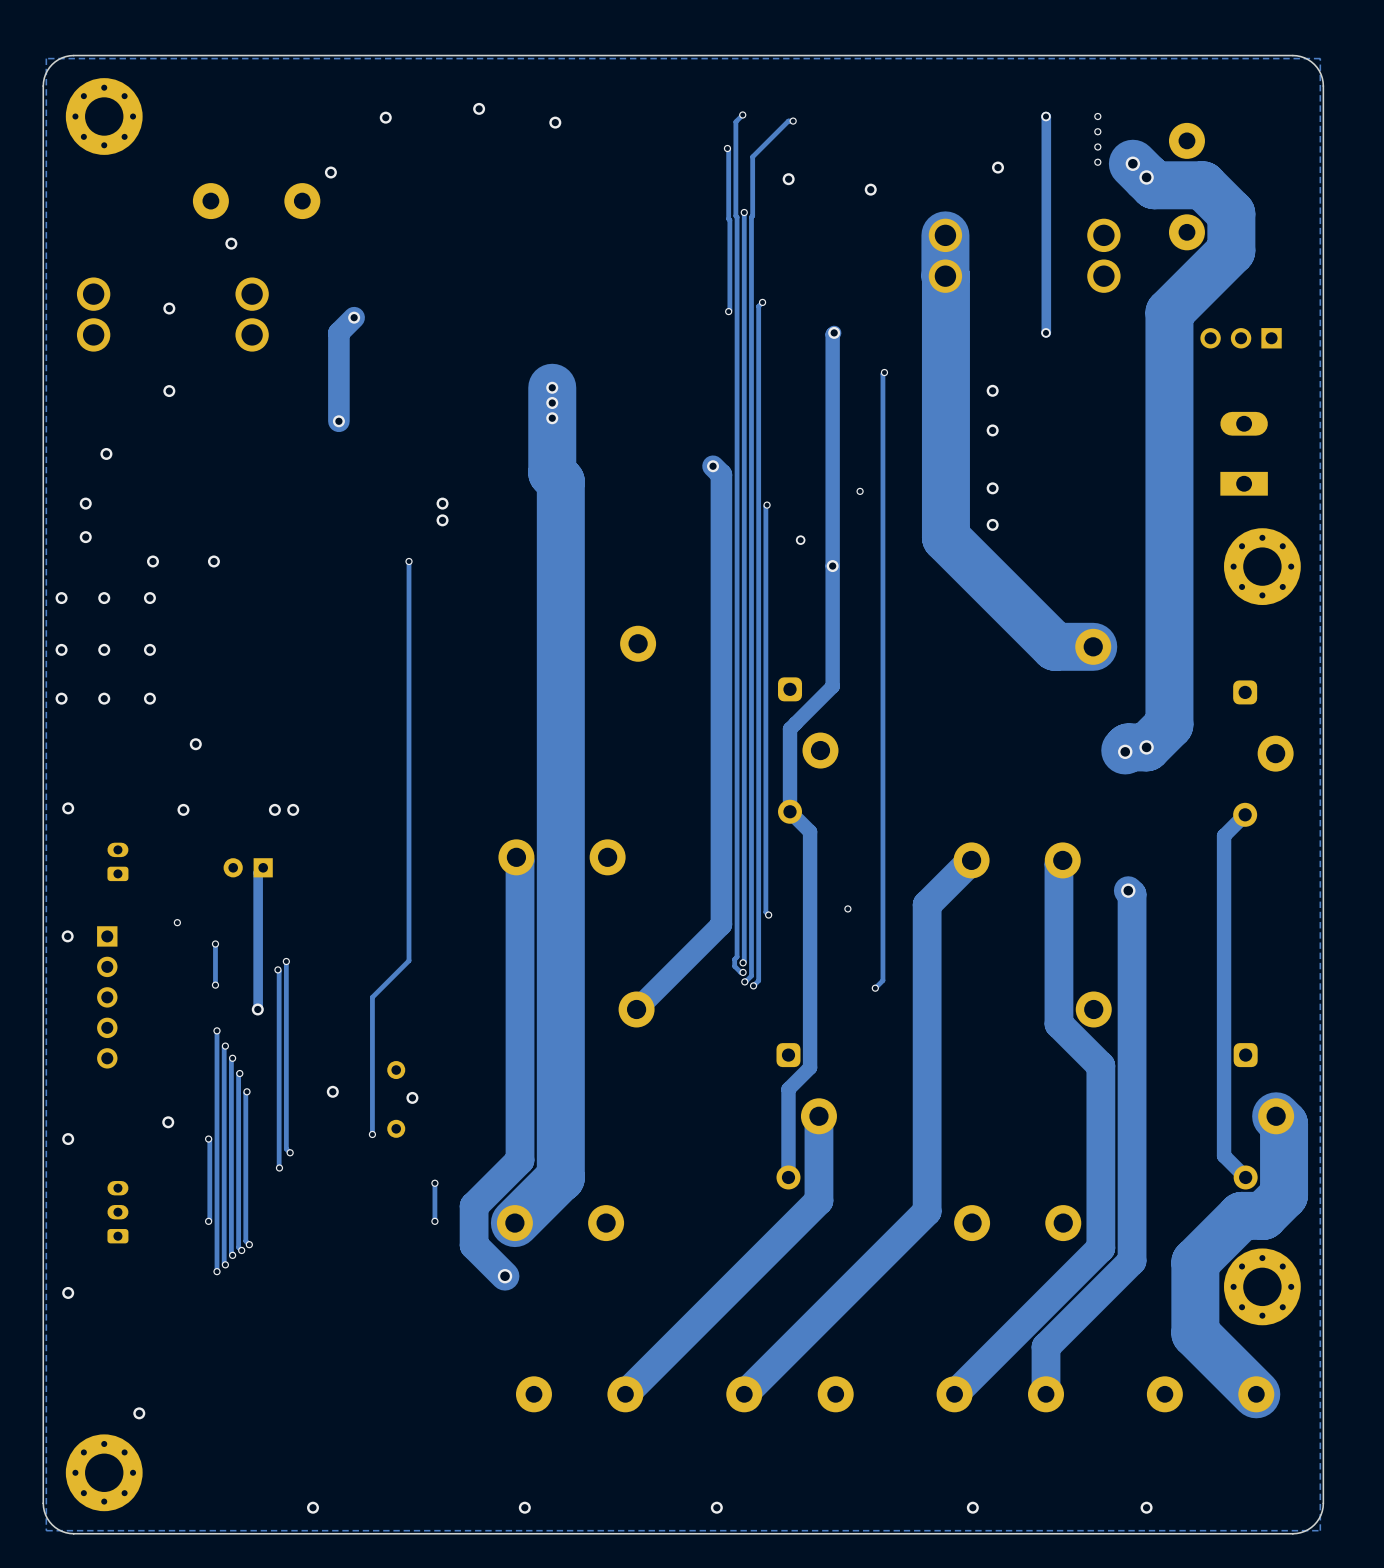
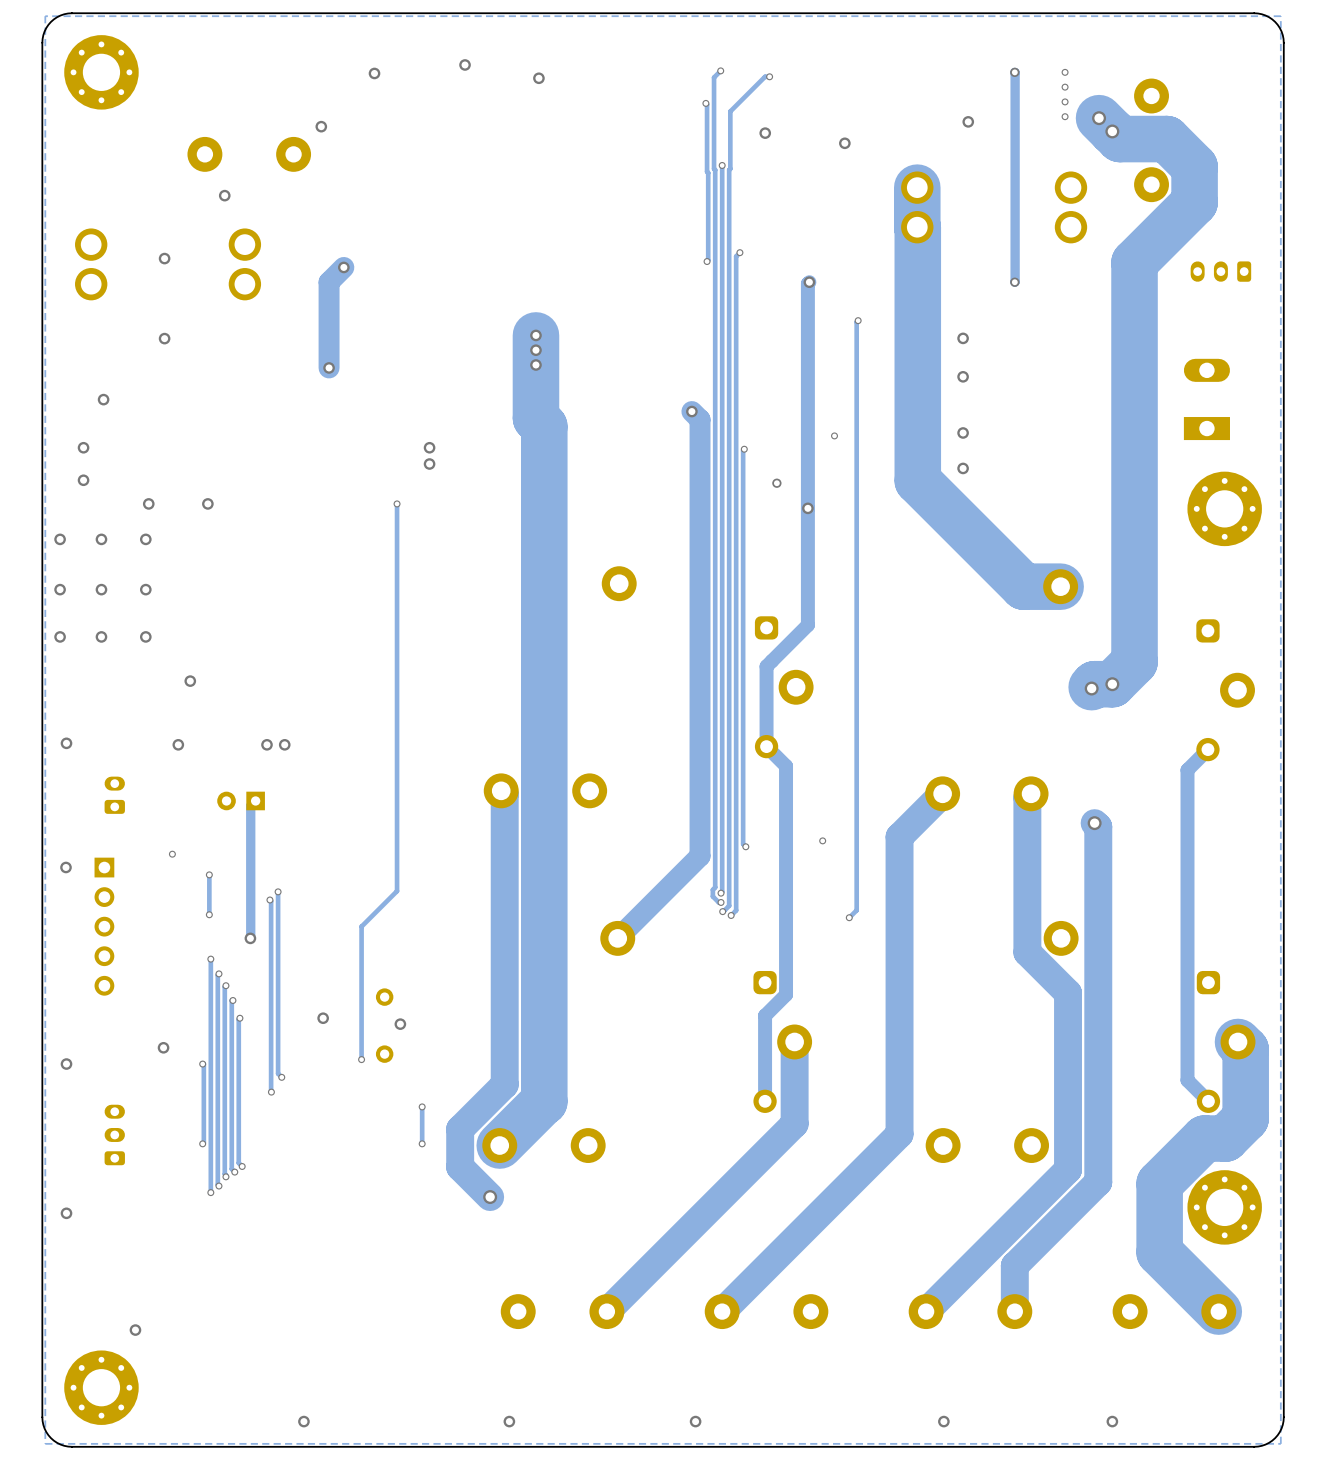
part: none -> (1220, 271)
part: (1241, 338) -> none

